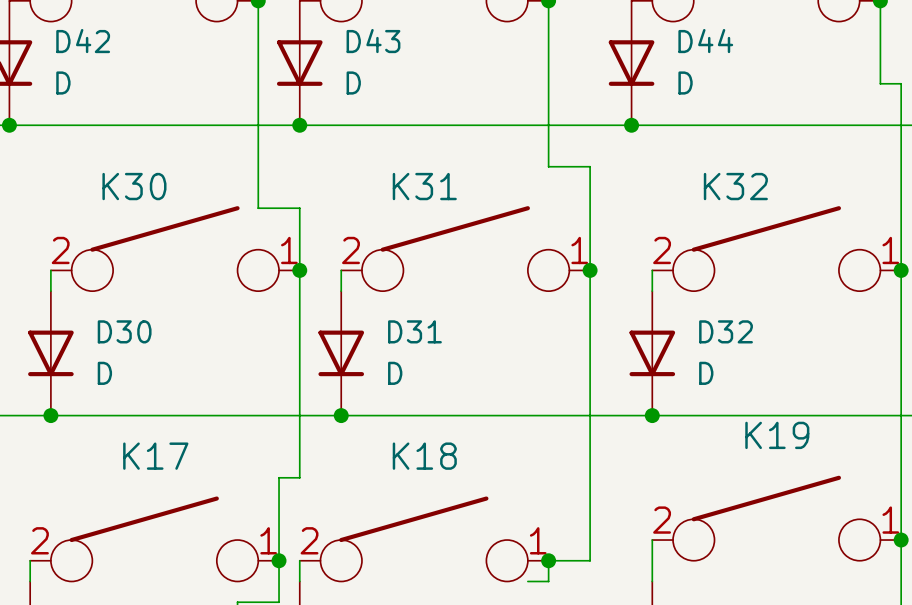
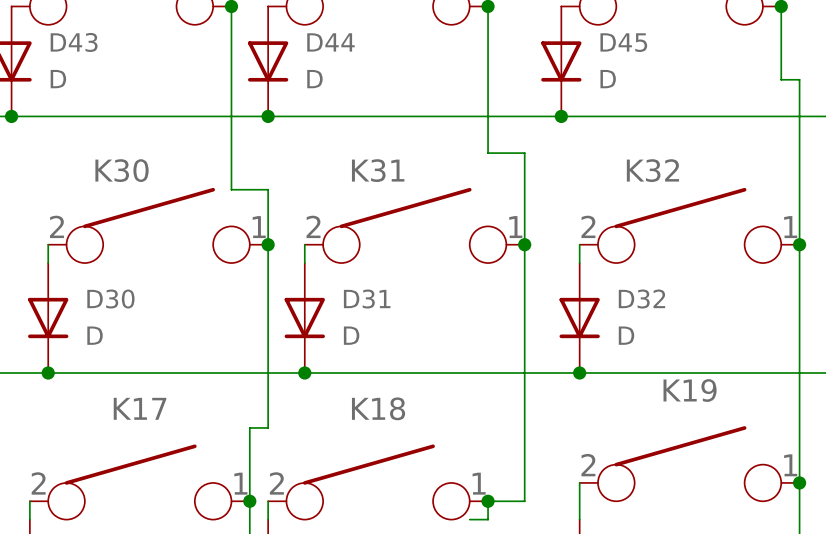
D42 name: D42 (83, 41) -> D43 (74, 42)
D43 name: D43 (373, 41) -> D44 (330, 42)
D44 name: D44 (705, 41) -> D45 (623, 42)

